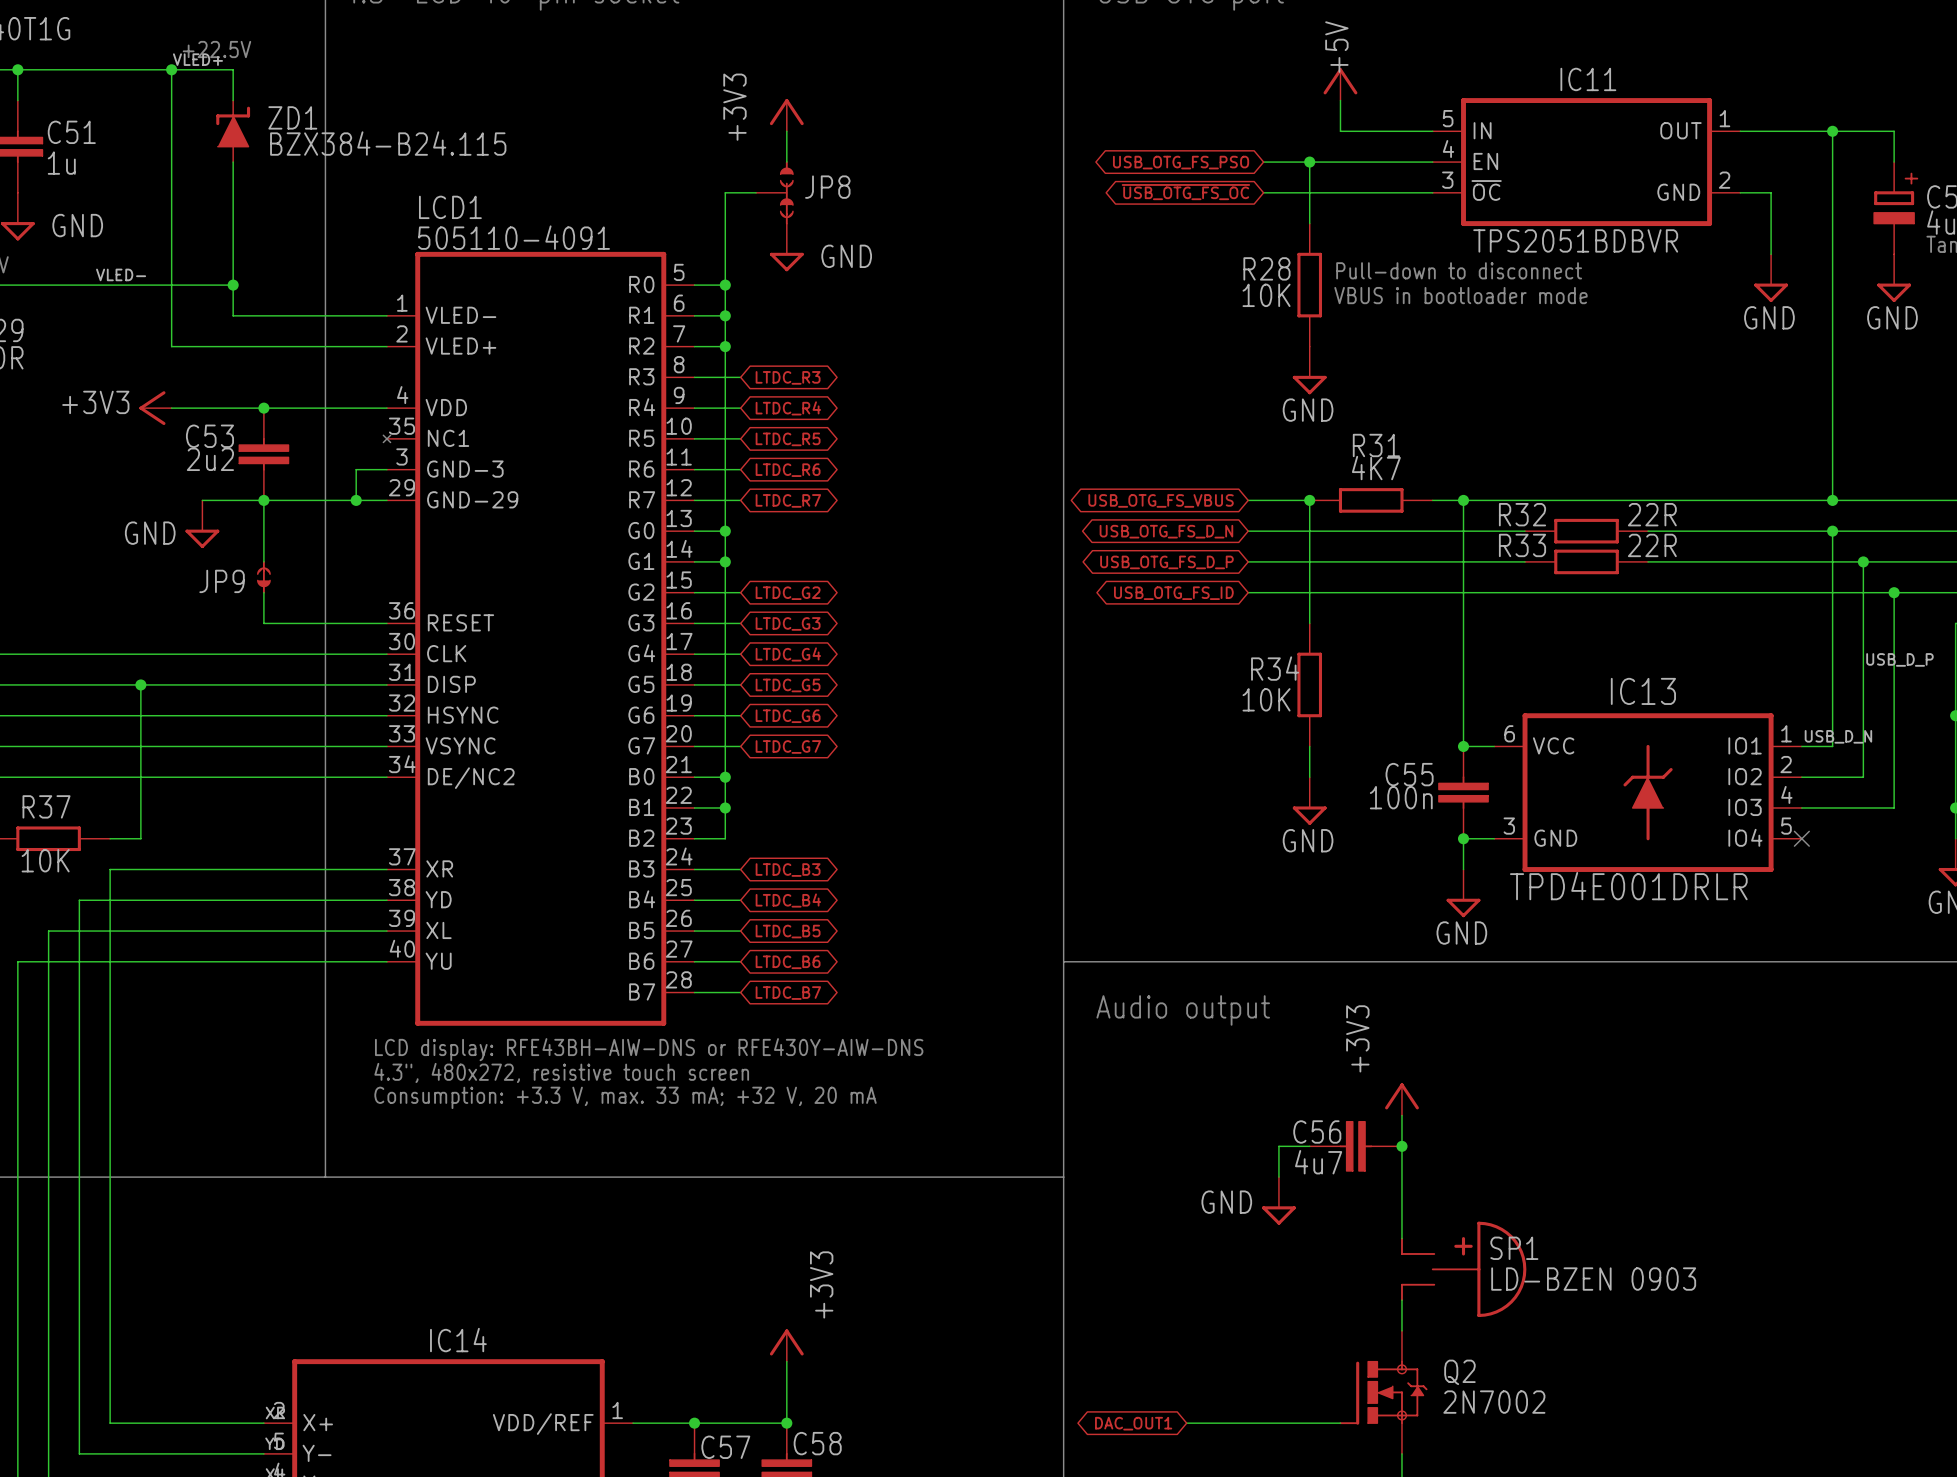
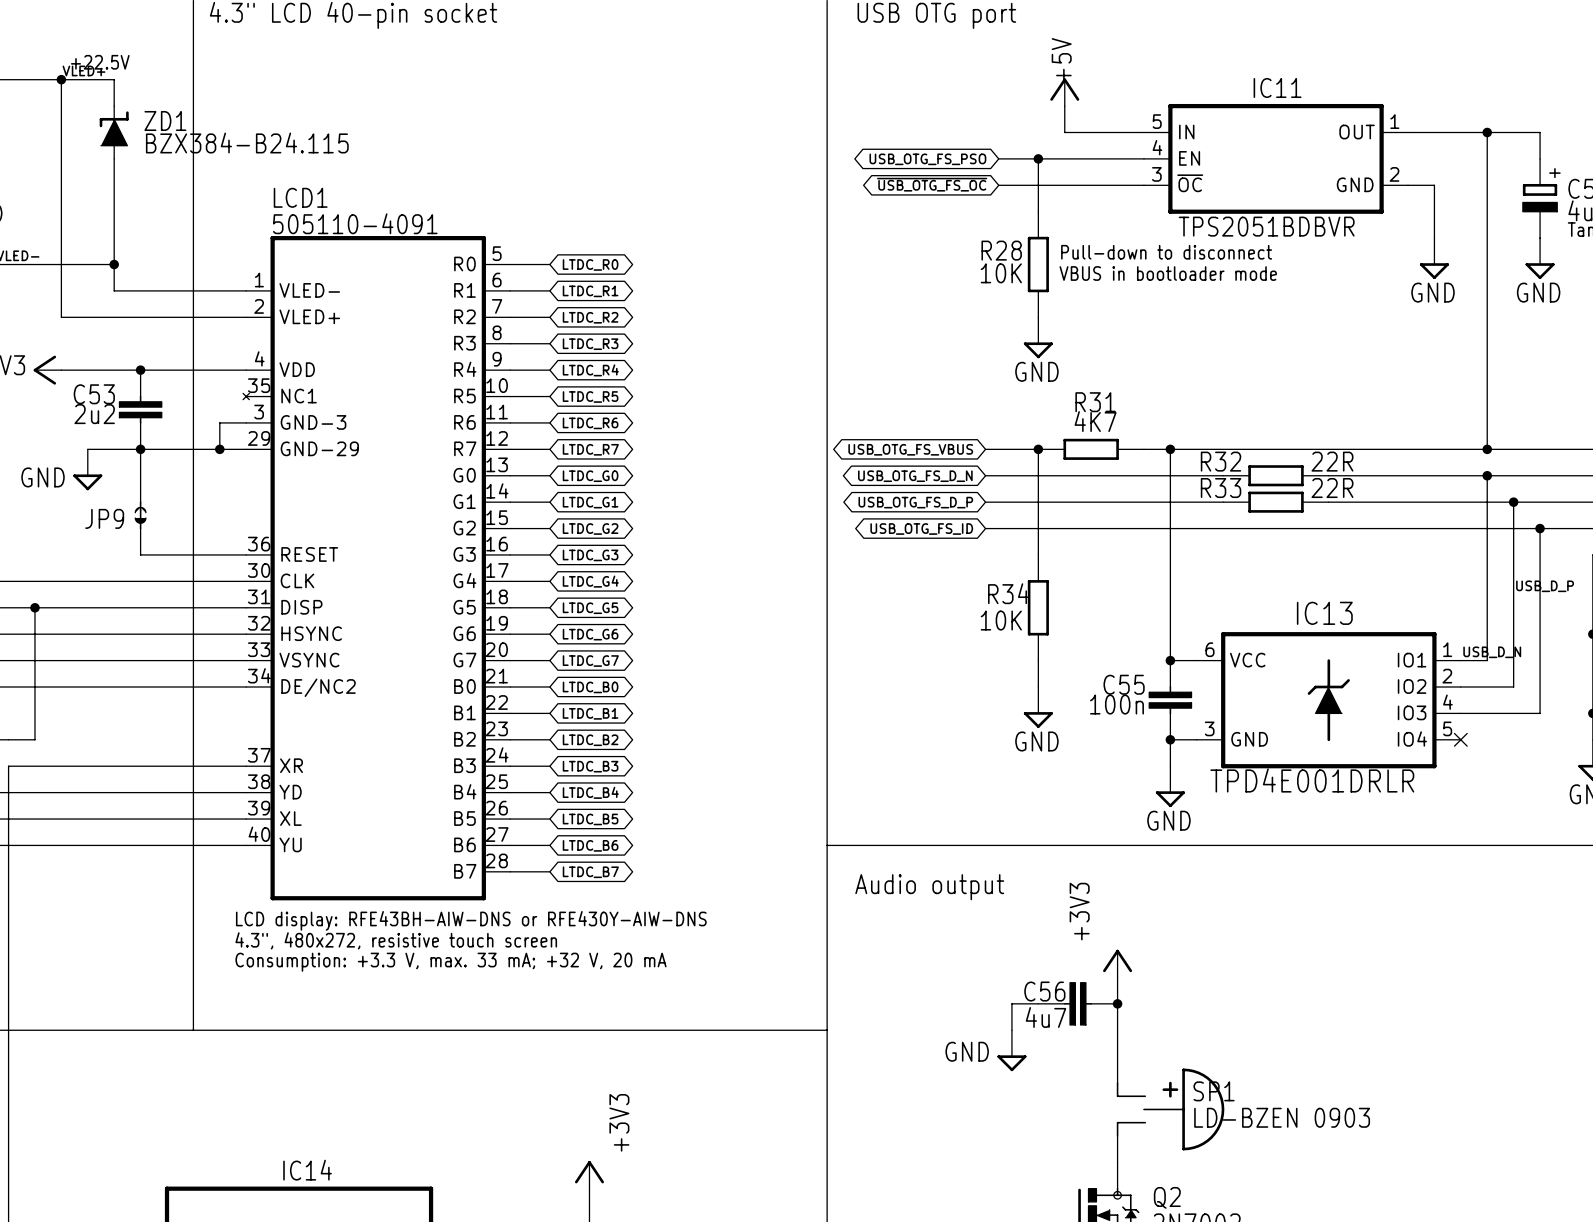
power symbol: +3V3 (786, 115) -> none
wire: (786, 131) (786, 162) -> none
wire: (756, 192) (725, 192) (725, 838) -> (549, 739) (536, 739)
JP8: (774, 192) -> none
power symbol: GND (786, 247) -> none
wire: none -> (536, 264) (549, 264)
junction: (725, 285) -> none
global label: none -> LTDC_R0 (590, 264)
wire: none -> (536, 290) (549, 290)
junction: (725, 315) -> none
global label: none -> LTDC_R1 (590, 291)
wire: none -> (536, 317) (549, 317)
junction: (725, 346) -> none
global label: none -> LTDC_R2 (590, 317)
wire: none -> (536, 475) (549, 475)
junction: (725, 531) -> none
global label: none -> LTDC_G0 (590, 476)
wire: none -> (536, 502) (549, 502)
junction: (725, 561) -> none
global label: none -> LTDC_G1 (590, 502)
wire: none -> (536, 686) (549, 686)
junction: (725, 777) -> none
global label: none -> LTDC_B0 (590, 687)
wire: none -> (536, 713) (549, 713)
junction: (725, 807) -> none
global label: none -> LTDC_B1 (590, 713)
global label: none -> LTDC_B2 (590, 740)

